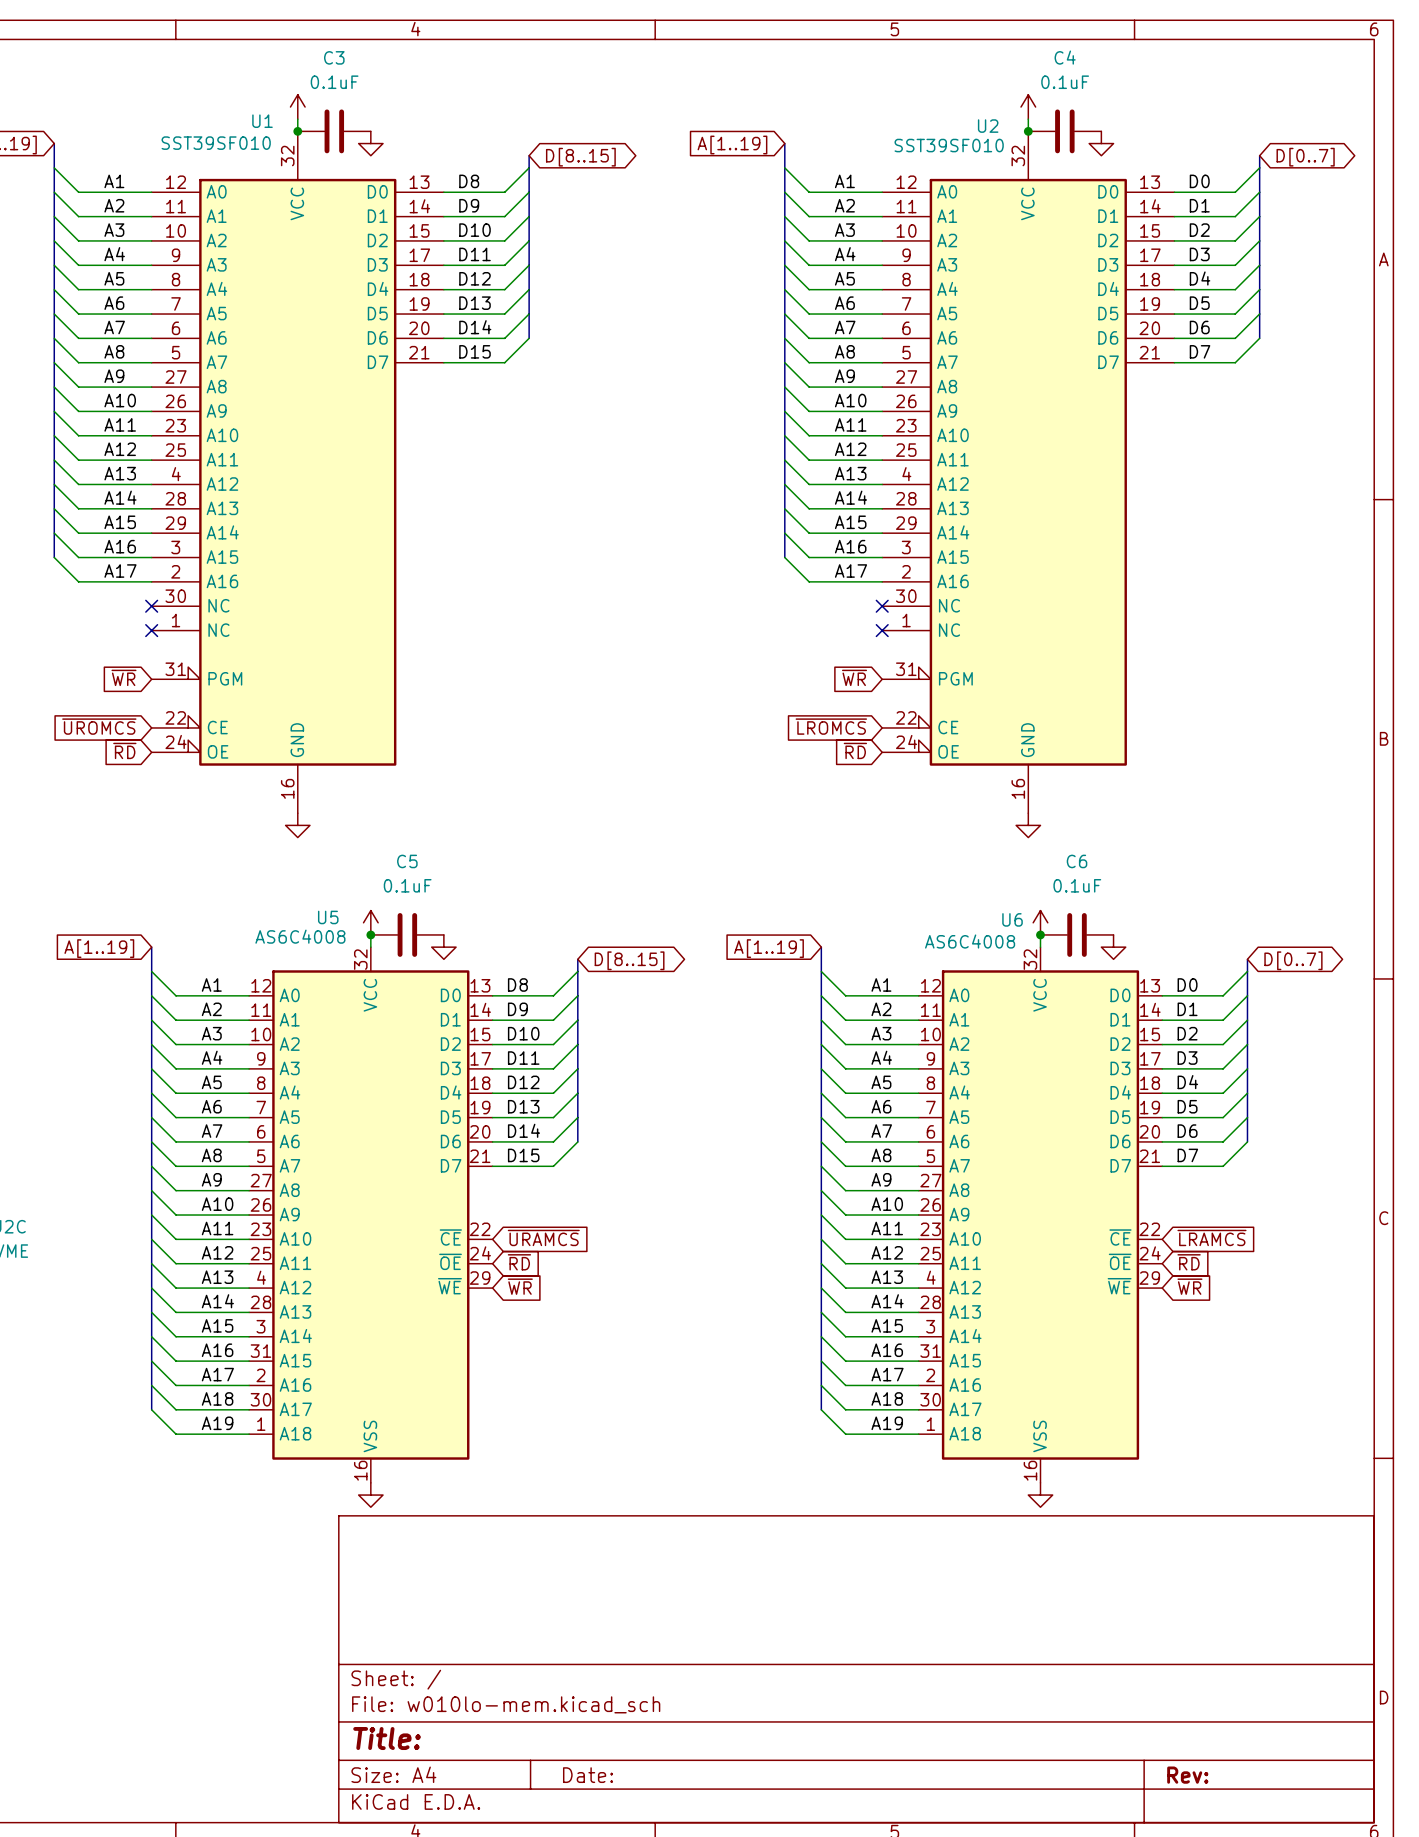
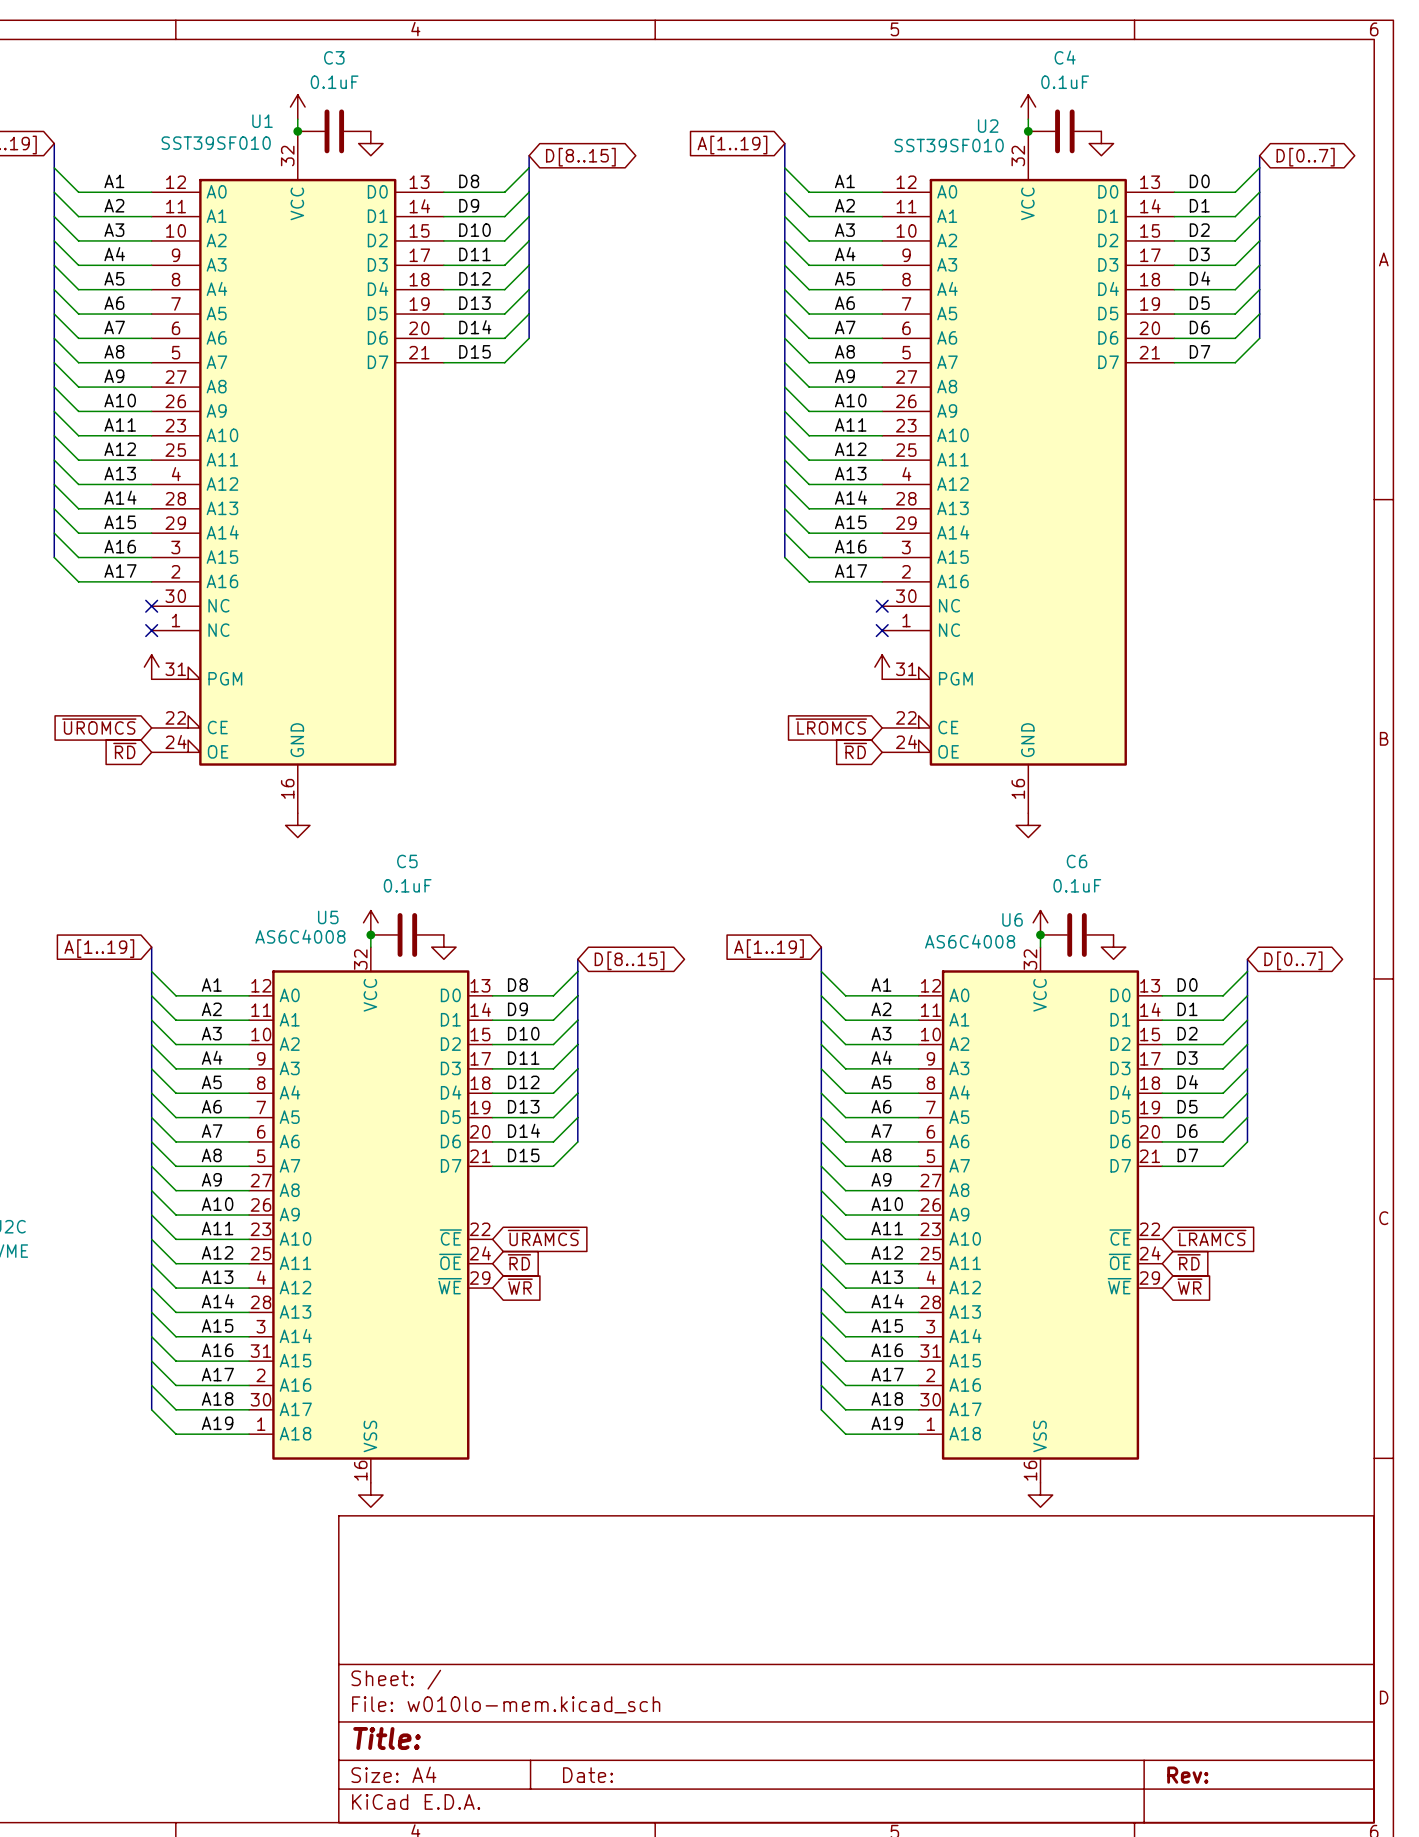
power symbol: none -> (151, 667)
power symbol: none -> (882, 667)
global label: ~{WR} (123, 677) -> none
global label: ~{WR} (854, 677) -> none

